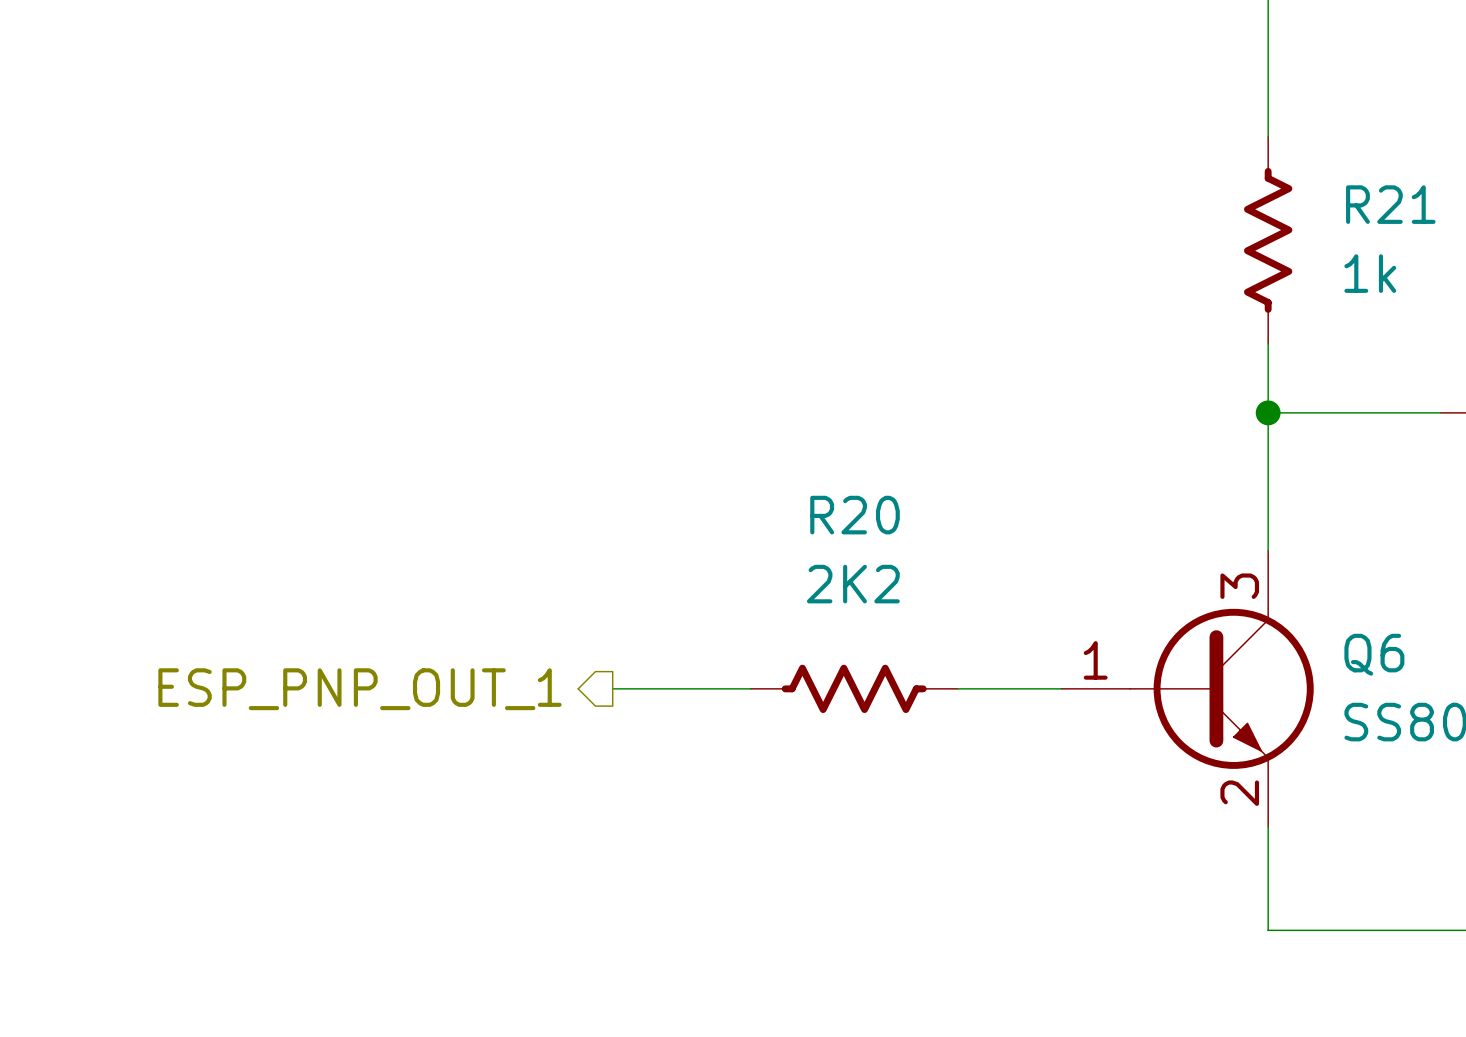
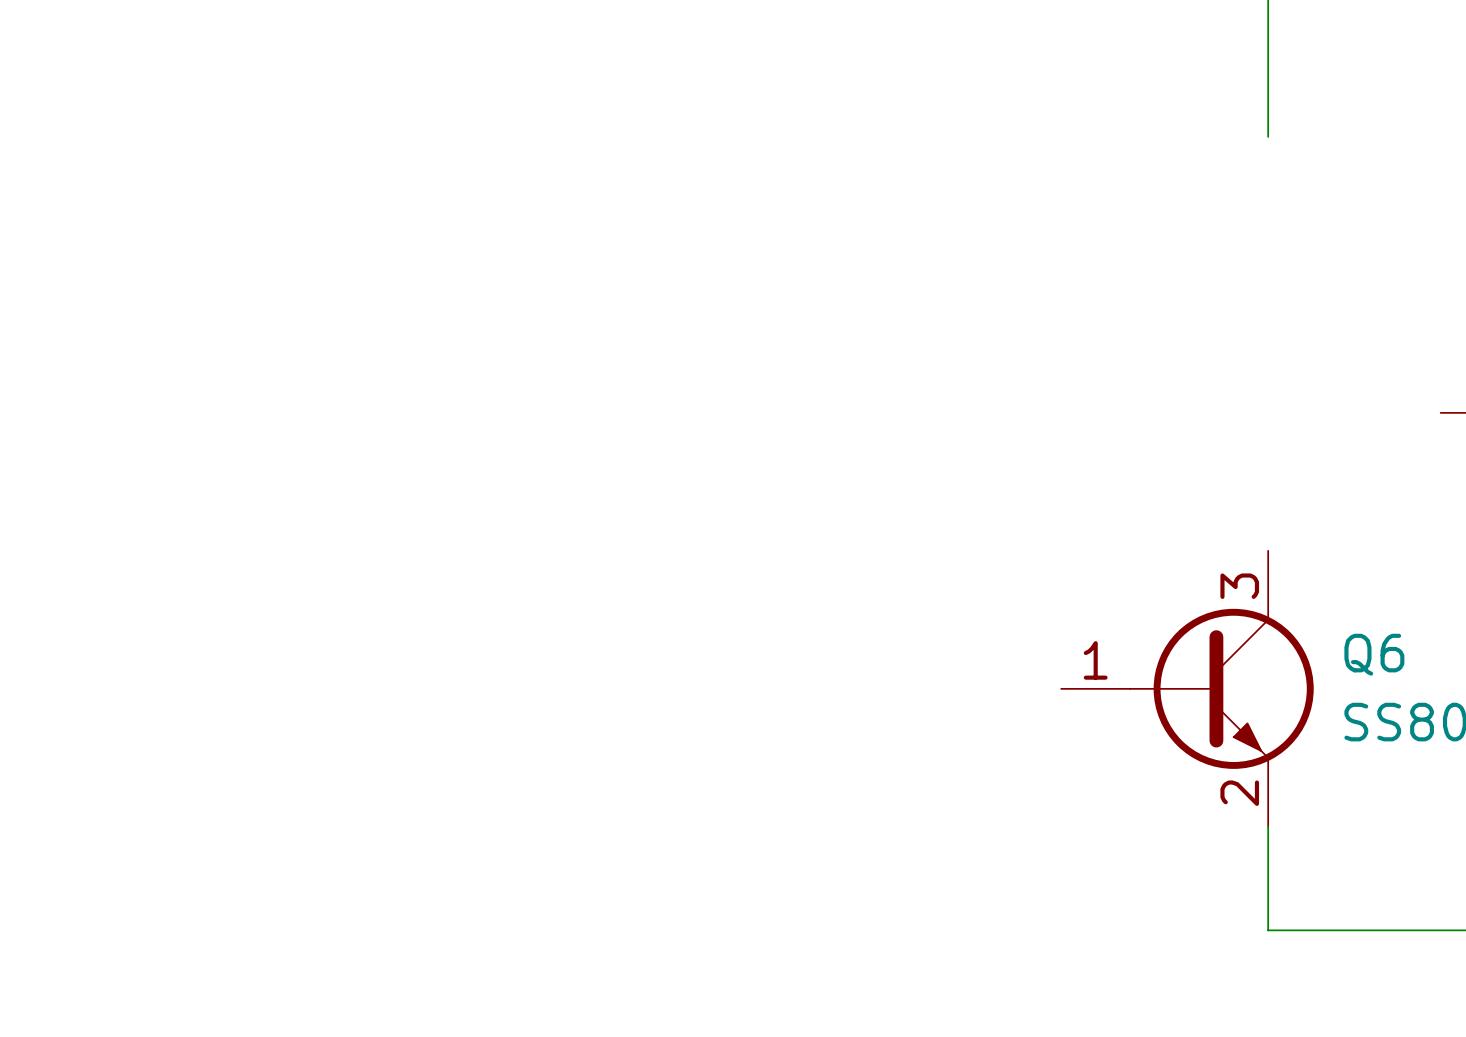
R21: 1k (1268, 240) -> none
wire: (1268, 343) (1268, 550) -> none
wire: (1268, 412) (1440, 412) -> none
junction: (1268, 412) -> none
wire: (612, 688) (750, 688) -> none
R20: 2K2 (854, 688) -> none
wire: (957, 688) (1061, 688) -> none
hierarchical label: ESP_PNP_OUT_1 (360, 689) -> none

